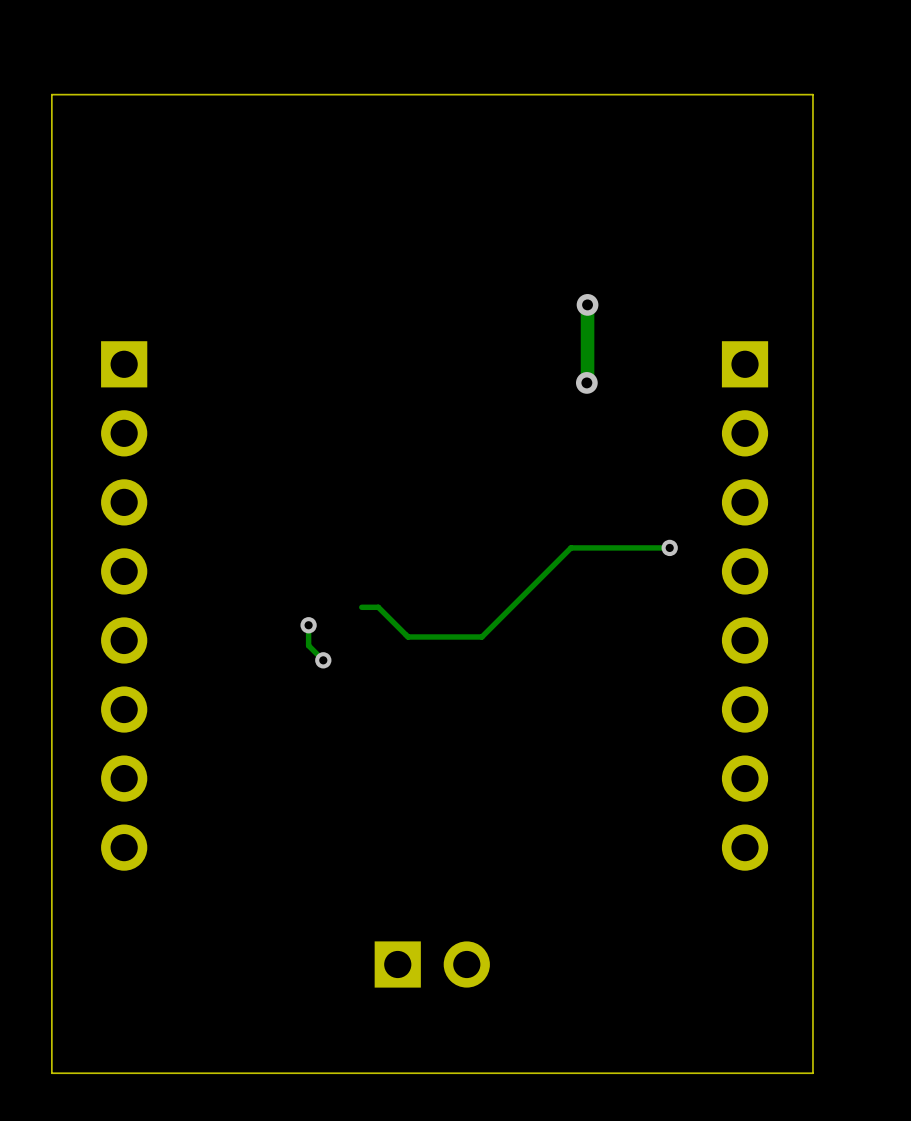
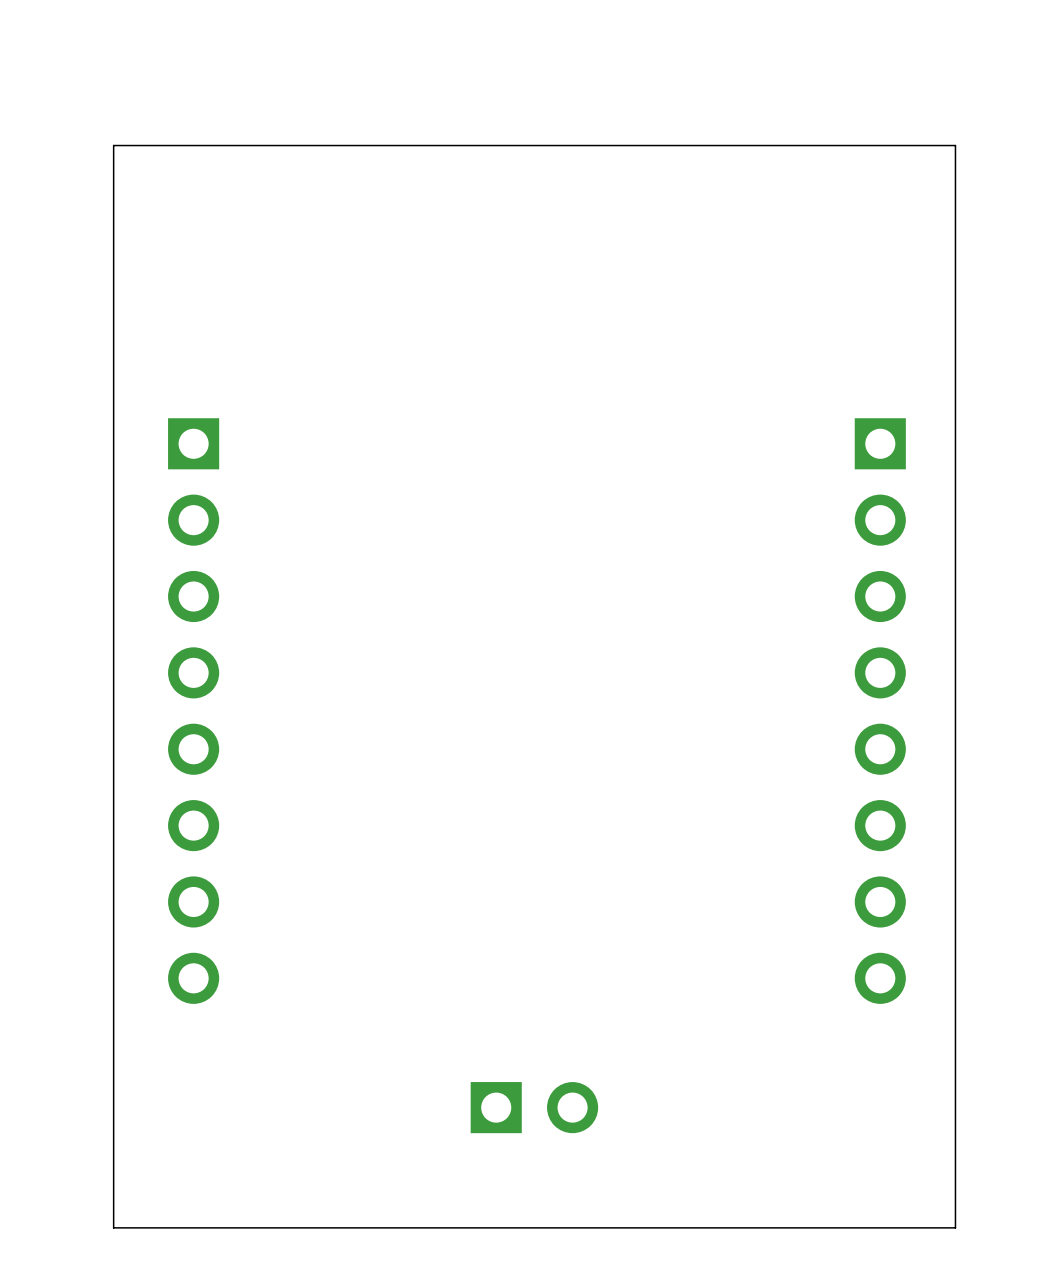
track: (587, 304) (586, 382) -> none
via: (587, 304) -> none
via: (586, 382) -> none
track: (669, 547) (570, 547) (481, 636) (408, 636) (378, 607) (361, 607) -> none
via: (669, 547) -> none
track: (308, 625) (308, 645) (323, 660) -> none
via: (308, 625) -> none
via: (323, 660) -> none

